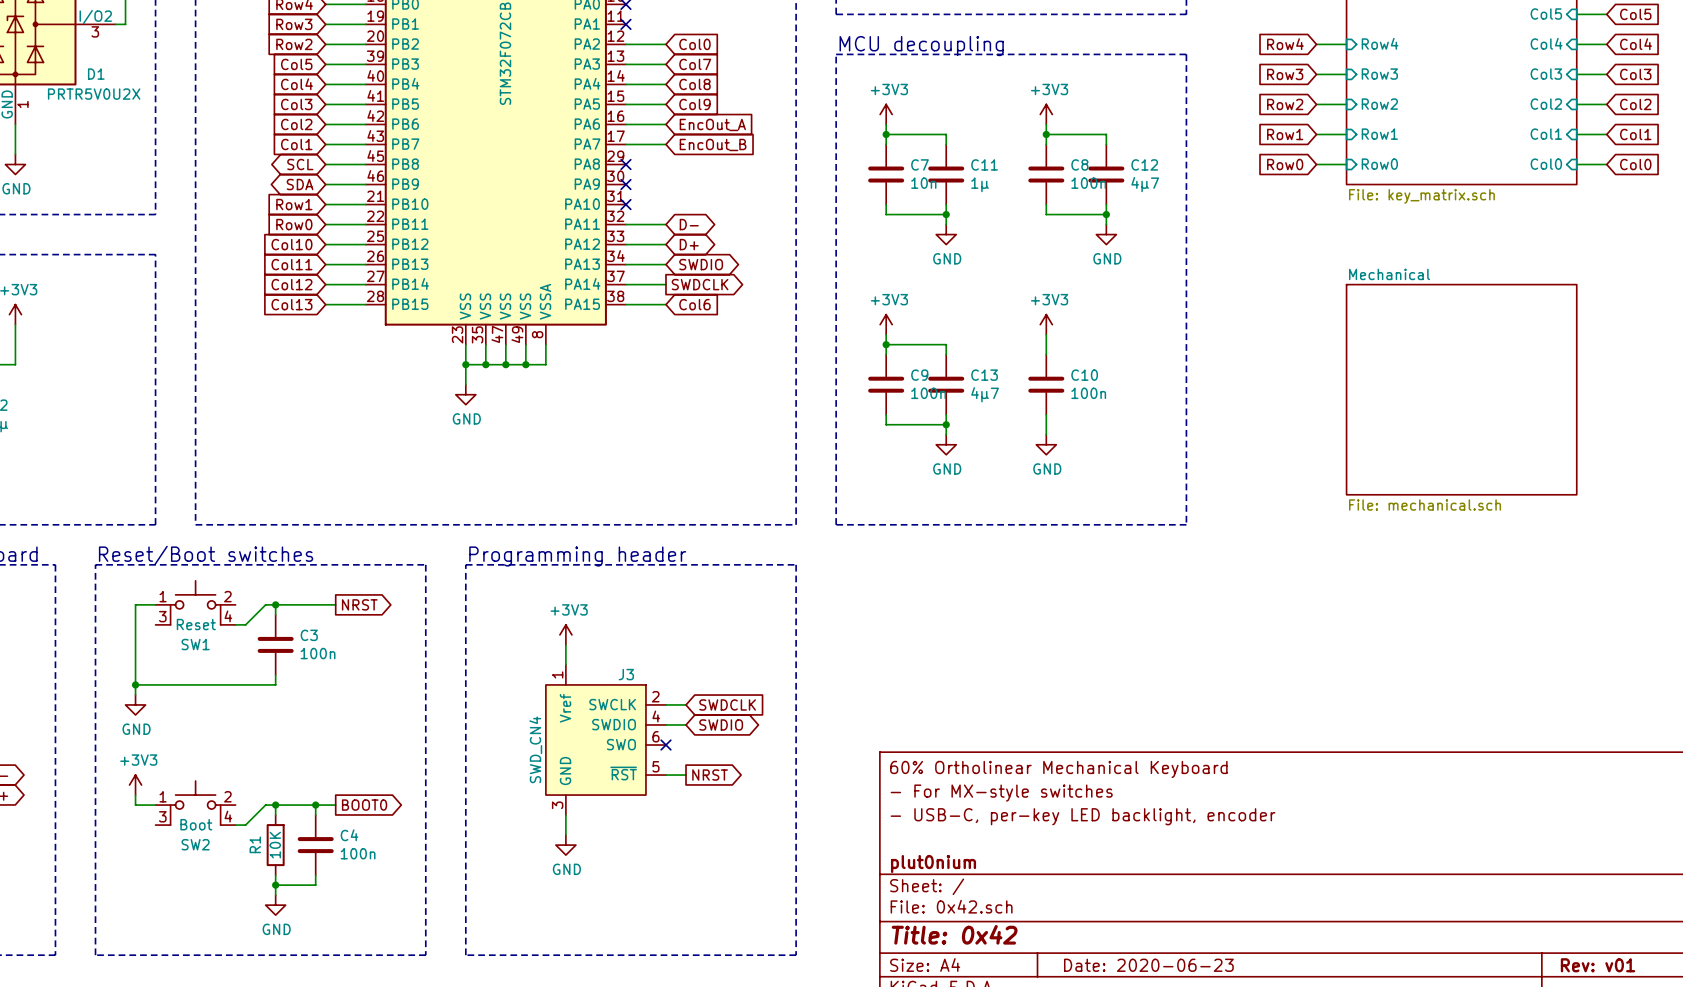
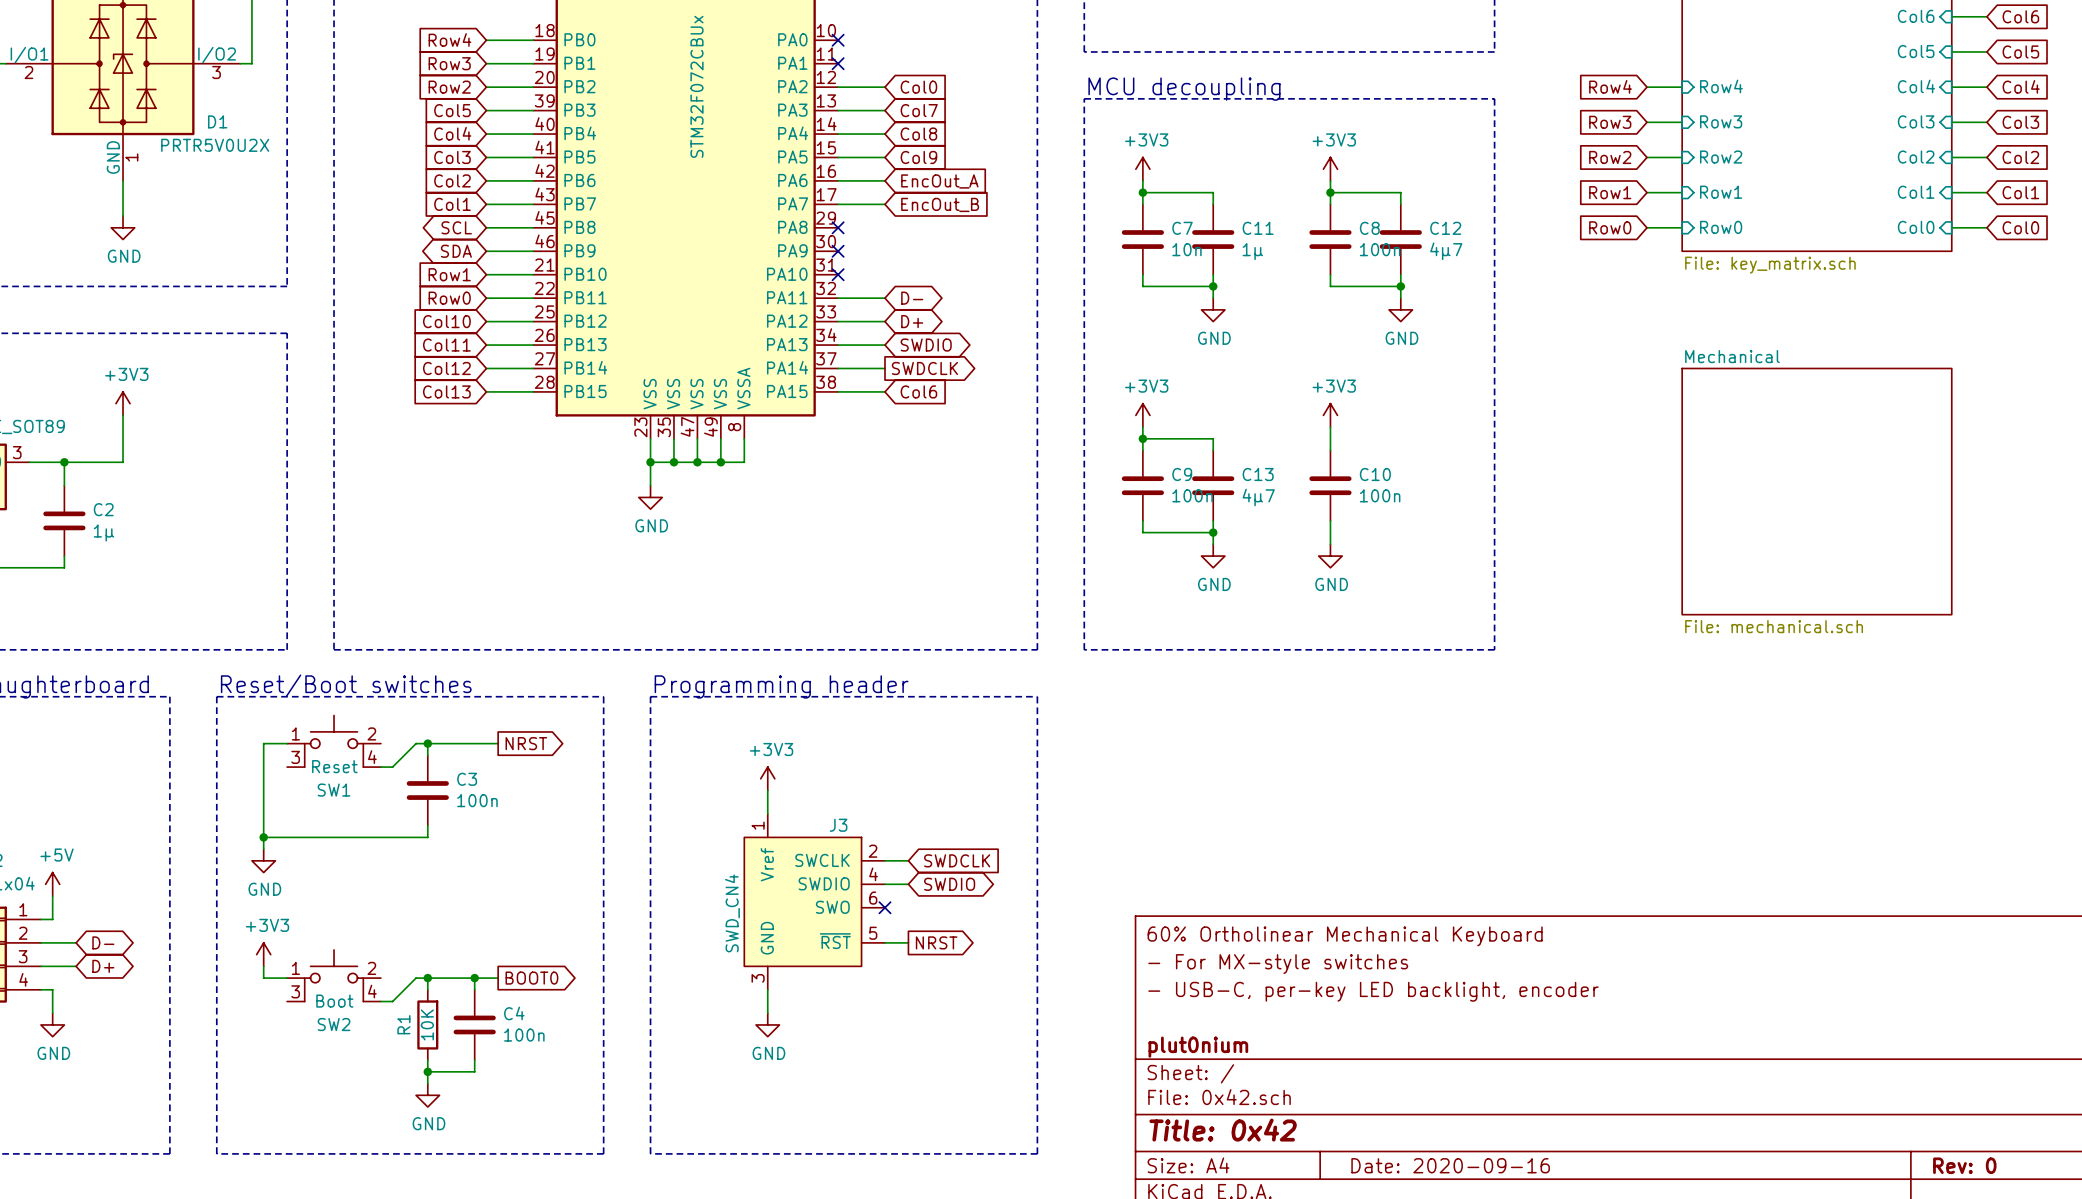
title block: Date: 2020-06-23 (1148, 965) -> Date: 2020-09-16 (1450, 1165)
title block: Rev: v01 (1598, 965) -> Rev: 0 (1964, 1165)

